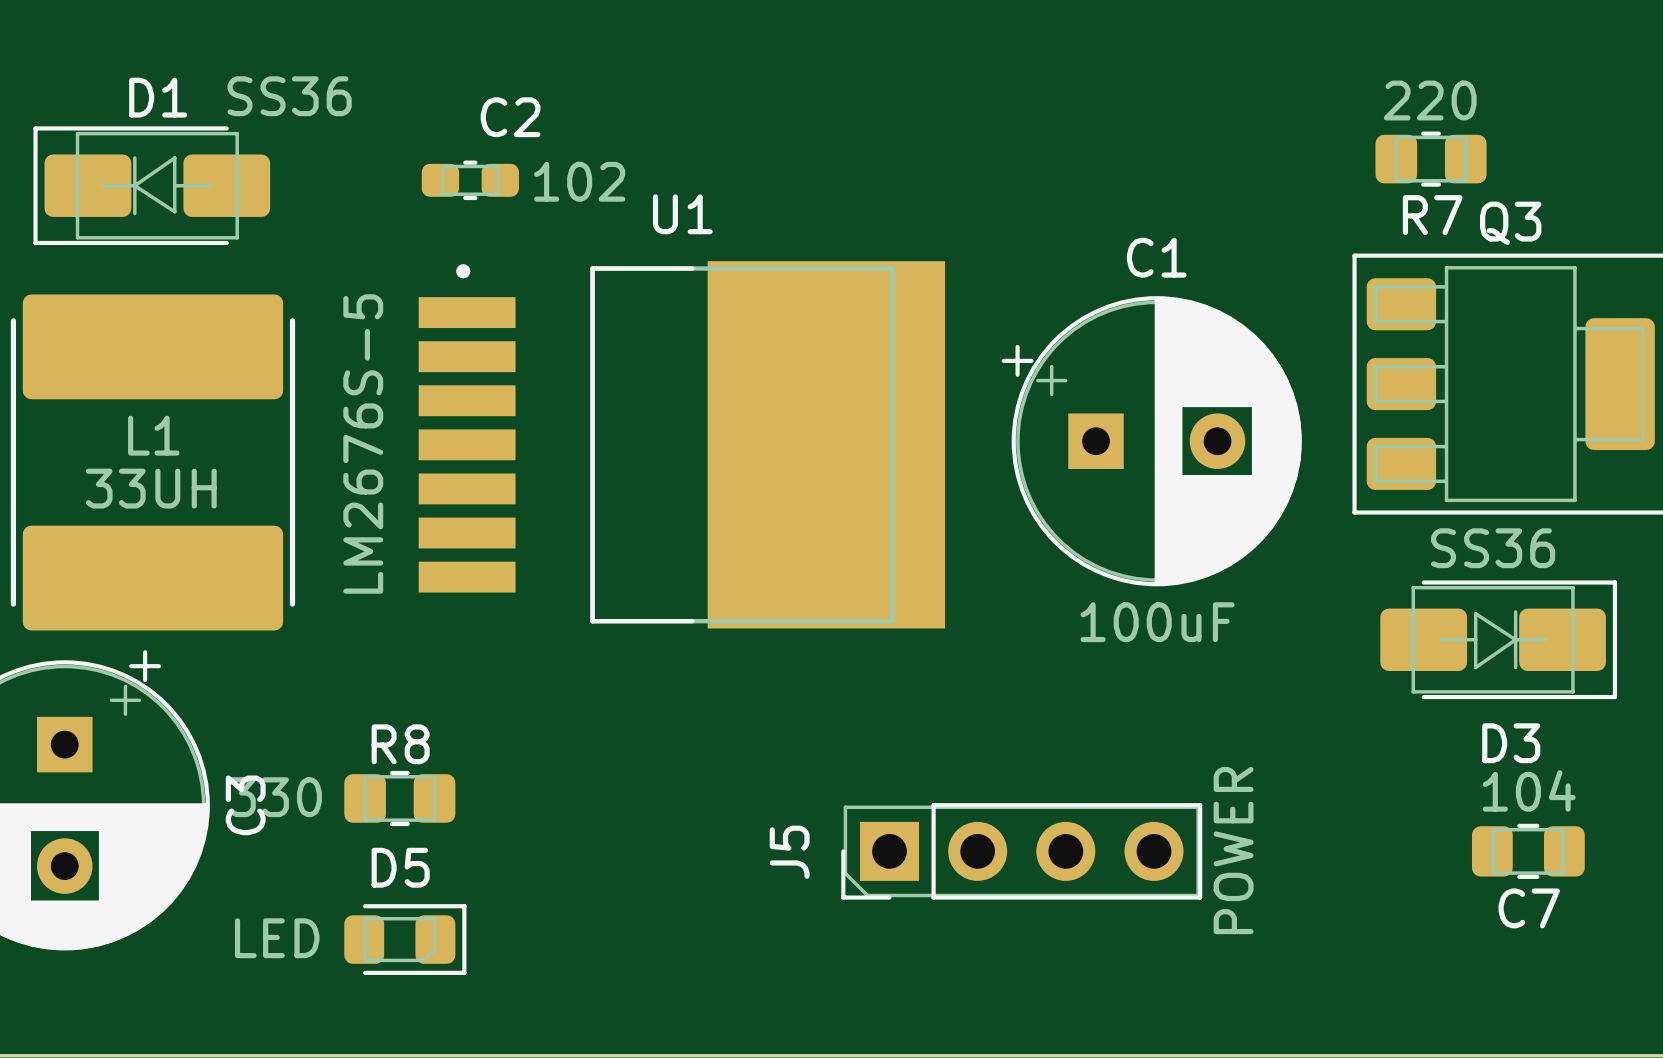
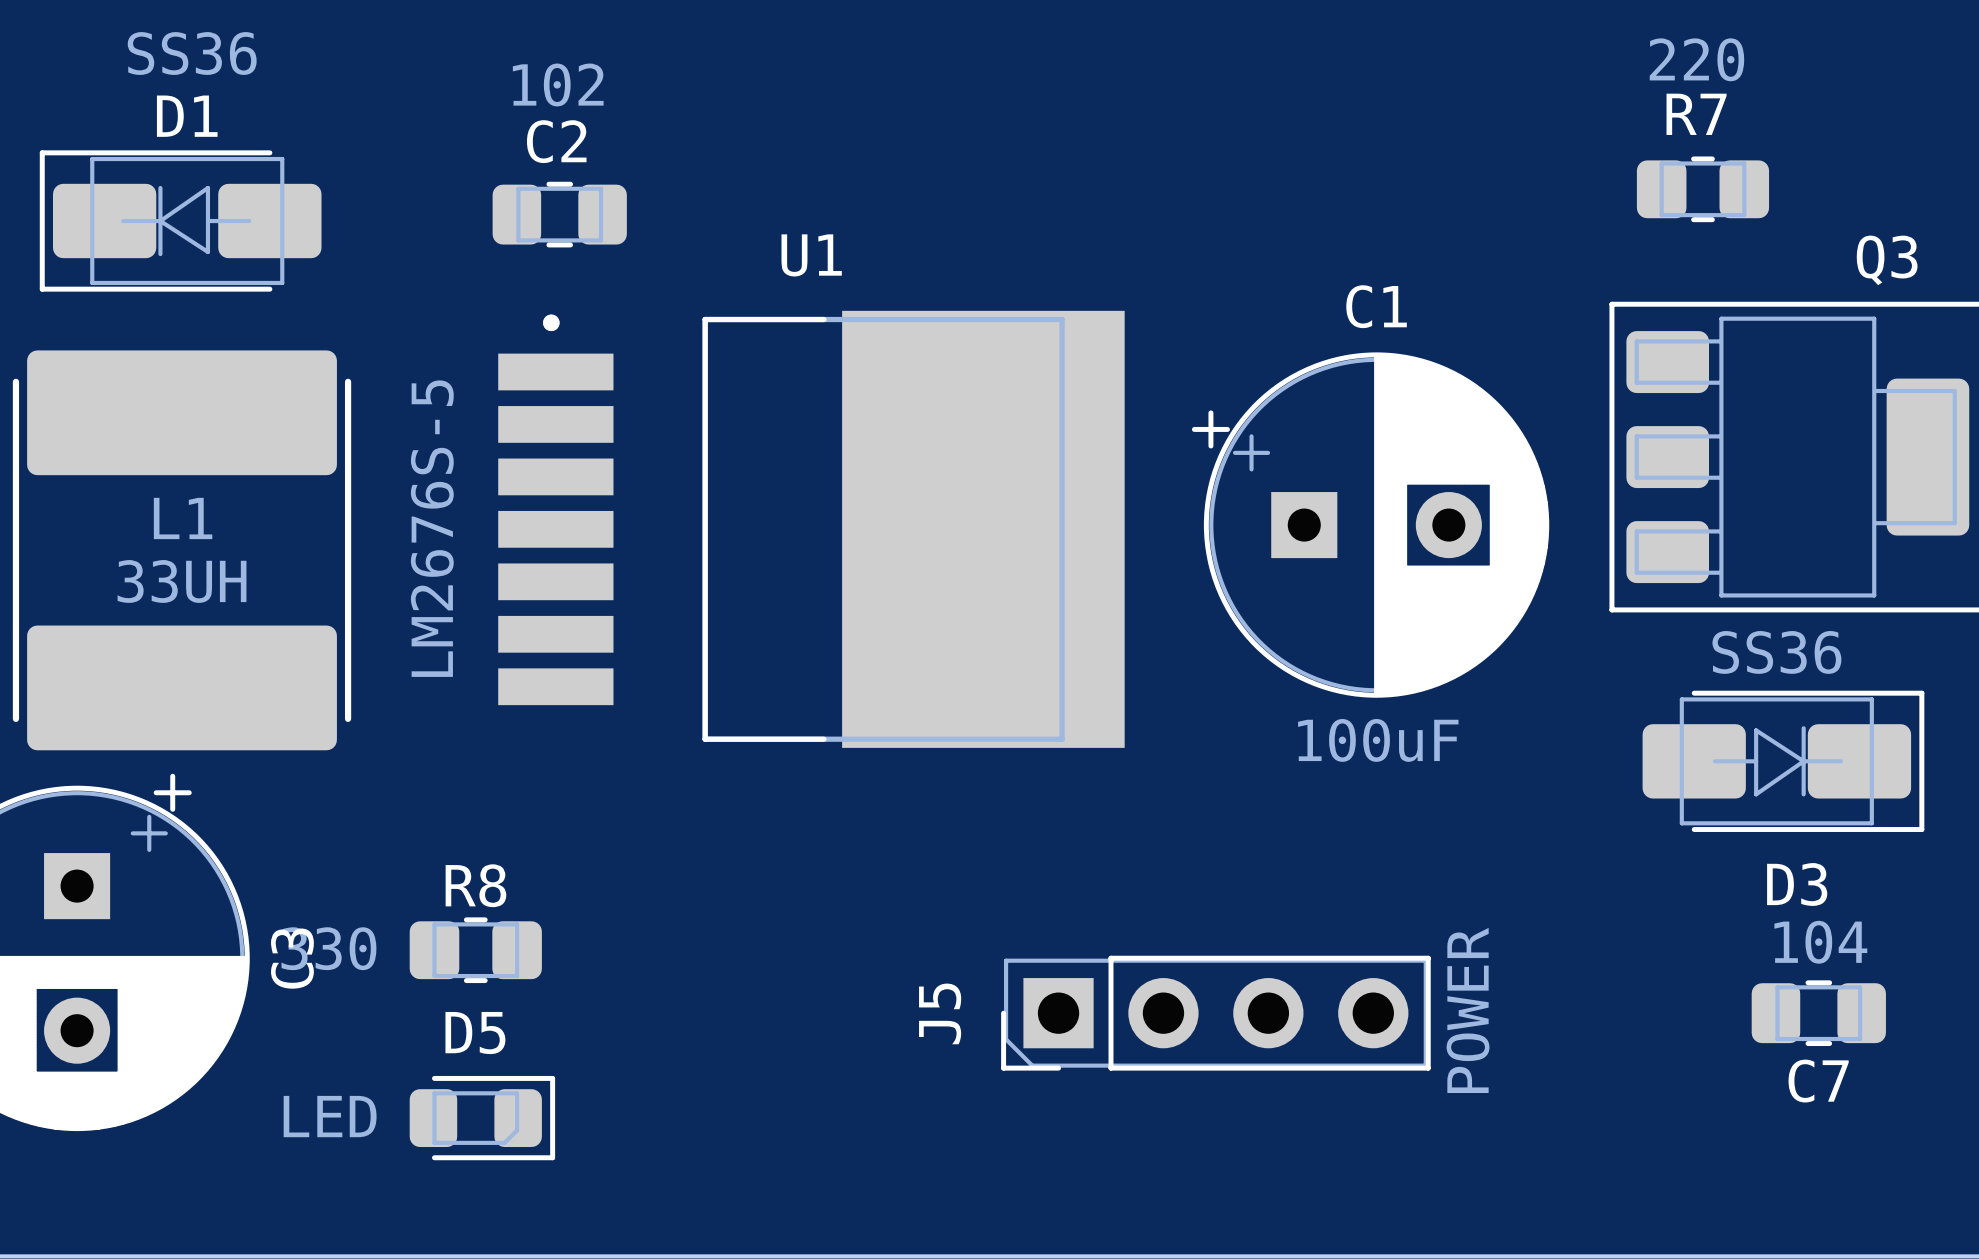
D1 value position: SS36 (289, 96) -> SS36 (192, 53)
R7 value position: 220 (1430, 100) -> 220 (1696, 59)
C2 name position: C2 (510, 117) -> C2 (556, 141)
C2 footprint: [421, 160, 519, 201] -> [492, 181, 627, 248]
C2 value position: 102 (579, 181) -> 102 (558, 84)
R7 name position: R7 (1432, 215) -> R7 (1696, 114)
Q3 name position: Q3 (1510, 223) -> Q3 (1887, 260)

